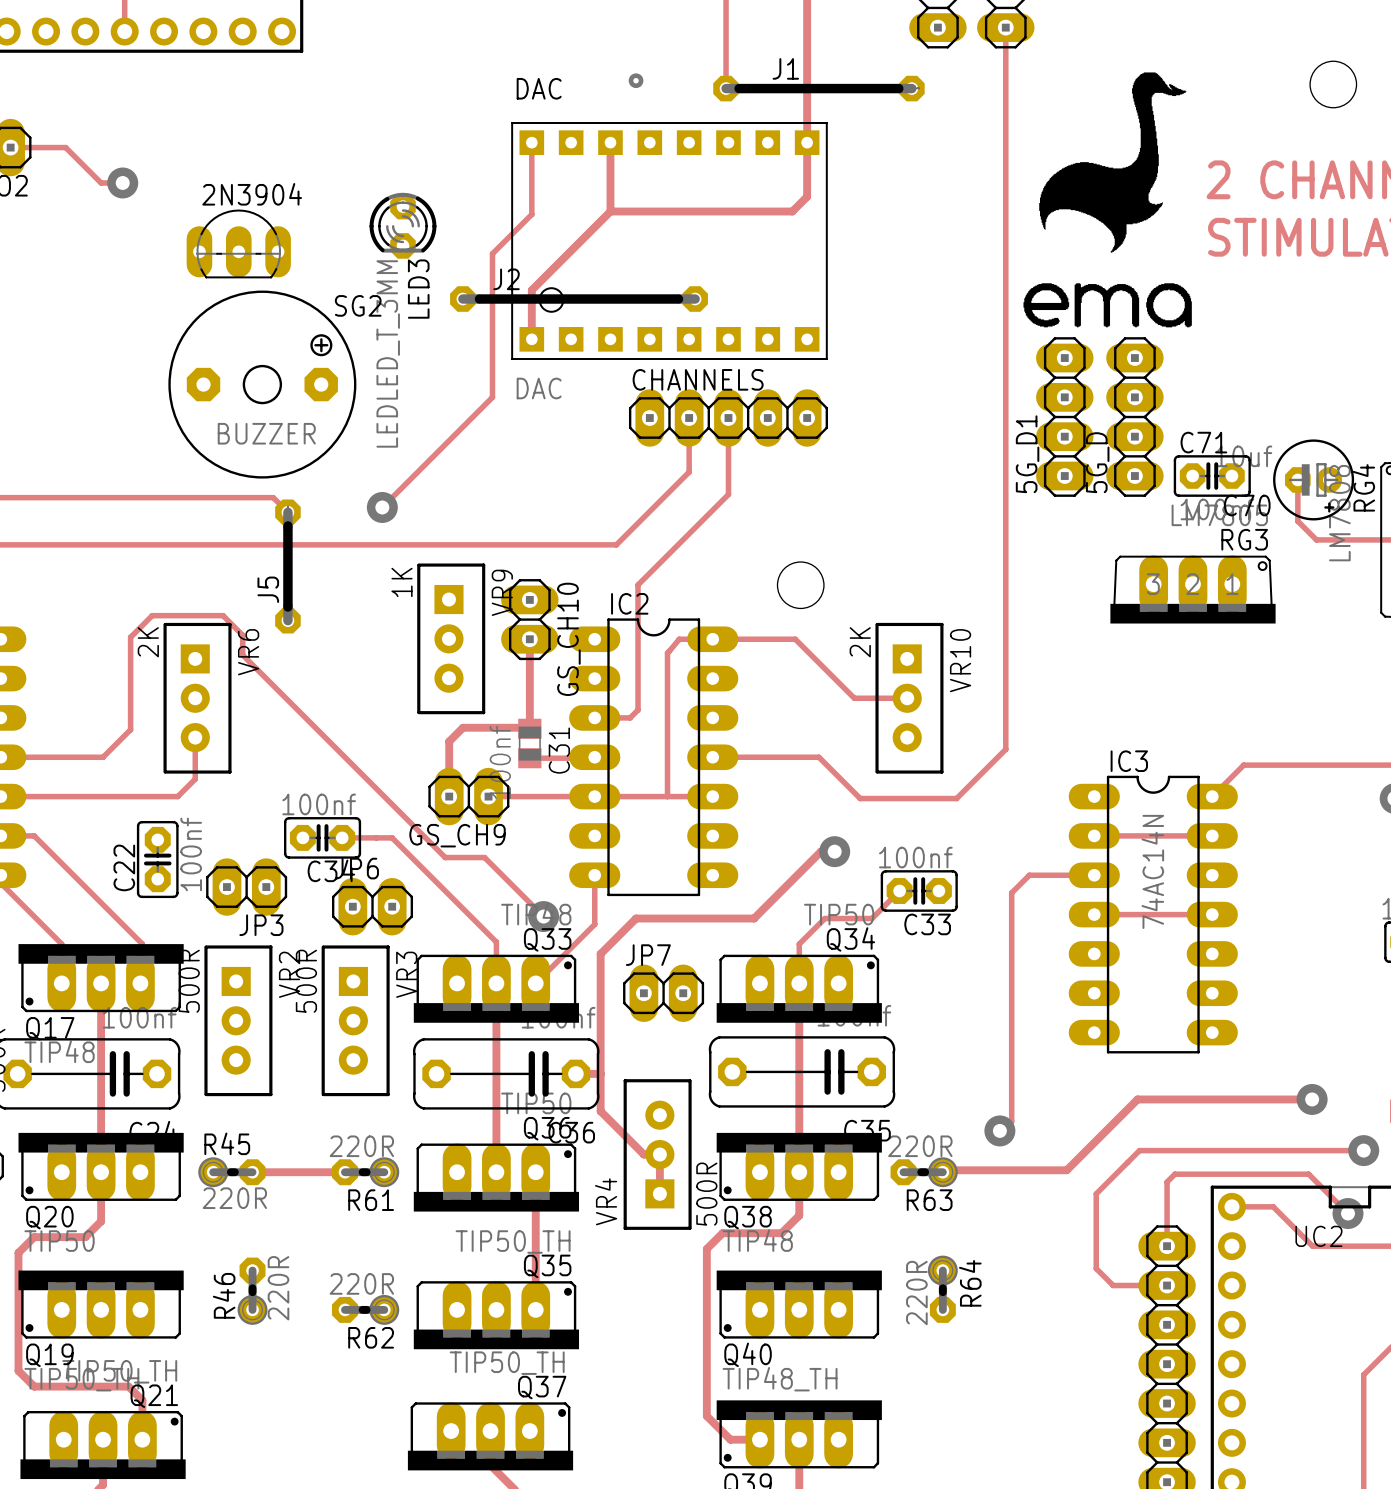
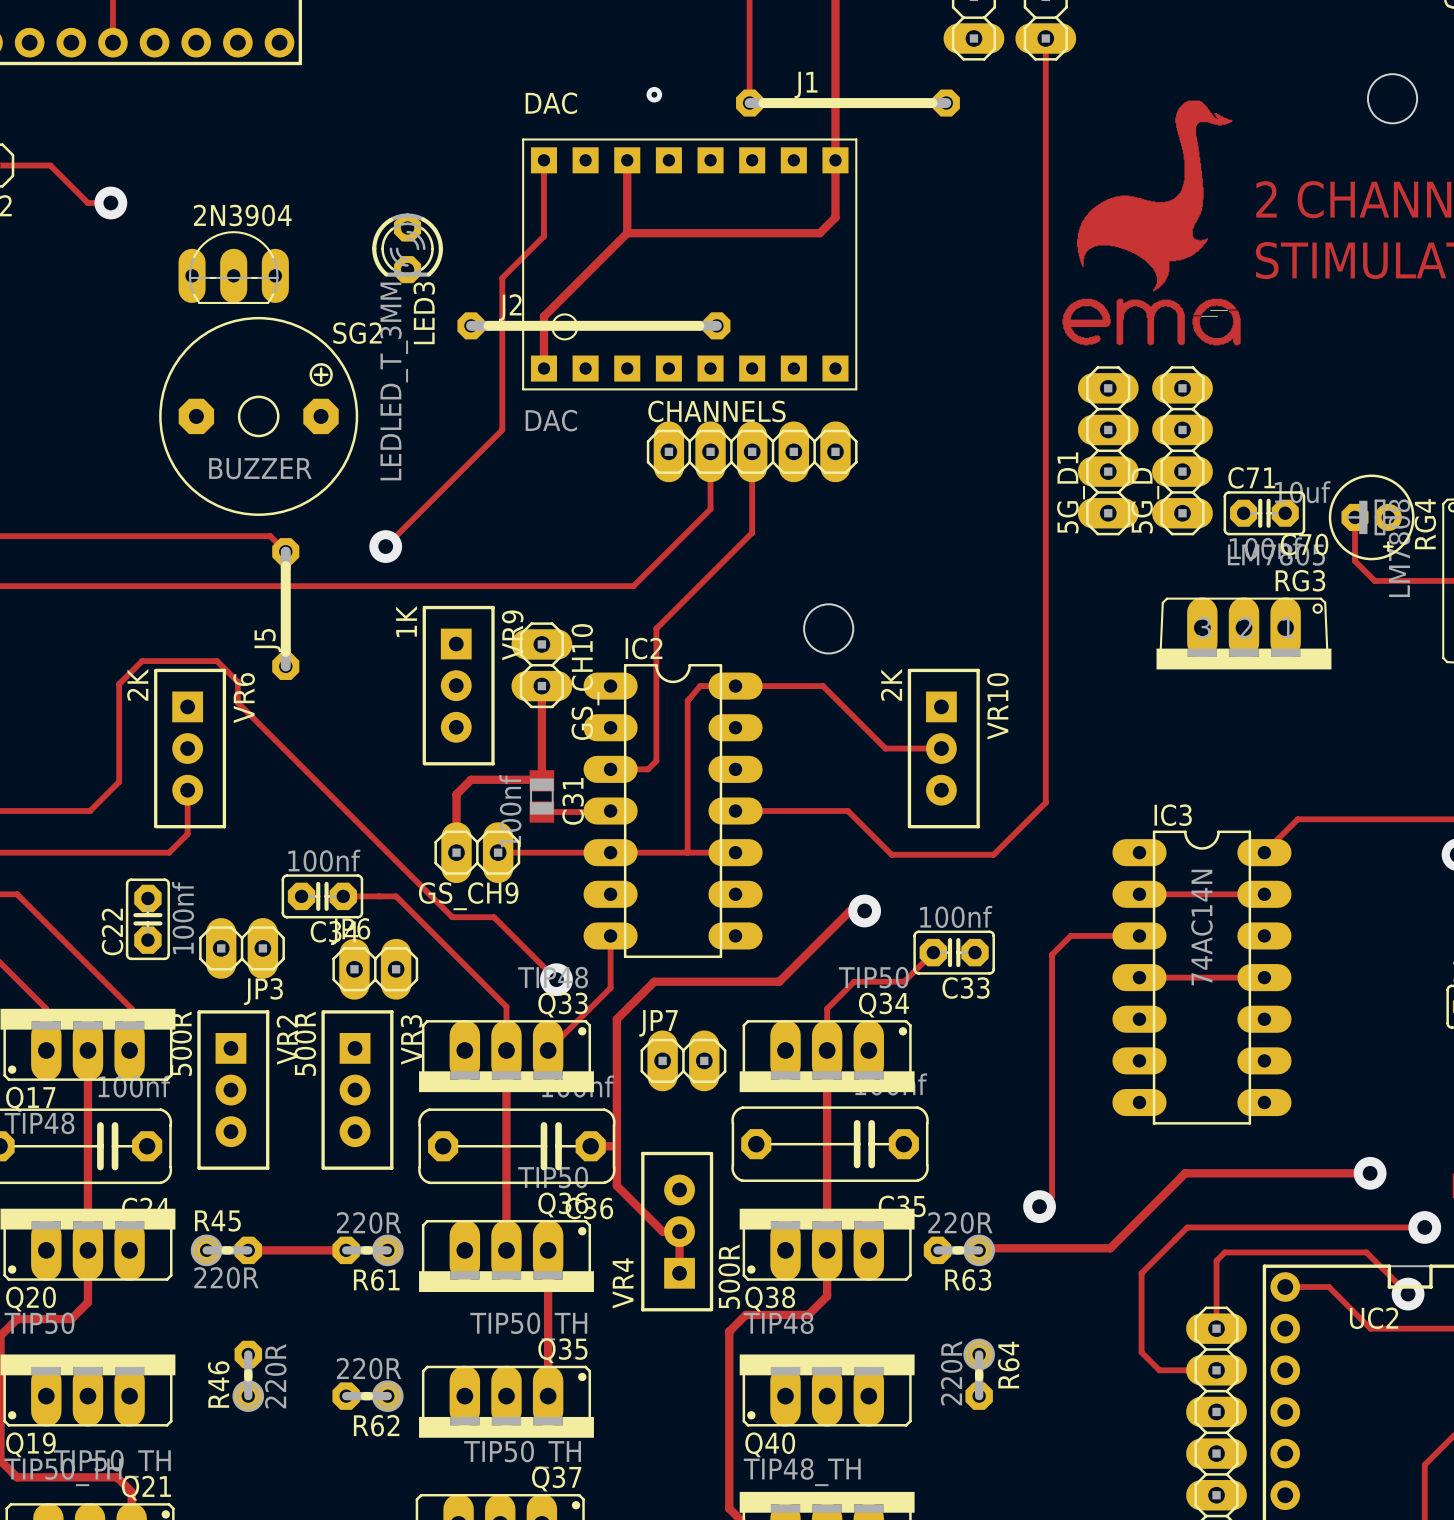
drawing: [1039, 72, 1187, 253] -> none
drawing: none -> [1062, 100, 1241, 346]
drawing: [1023, 283, 1192, 328] -> none

